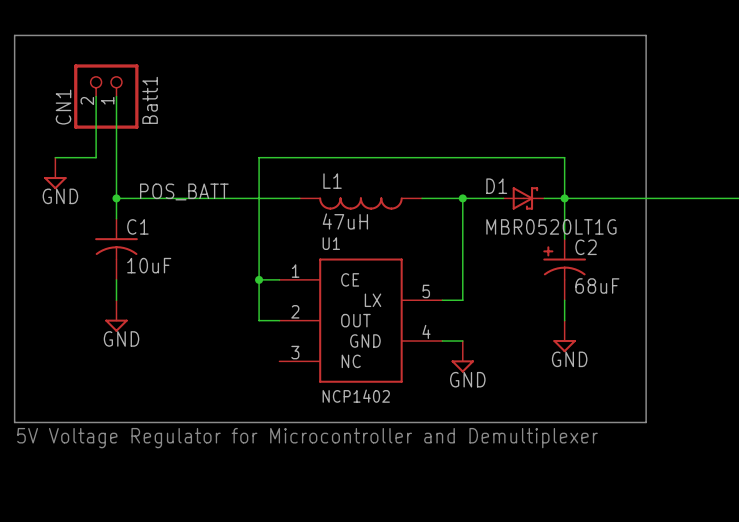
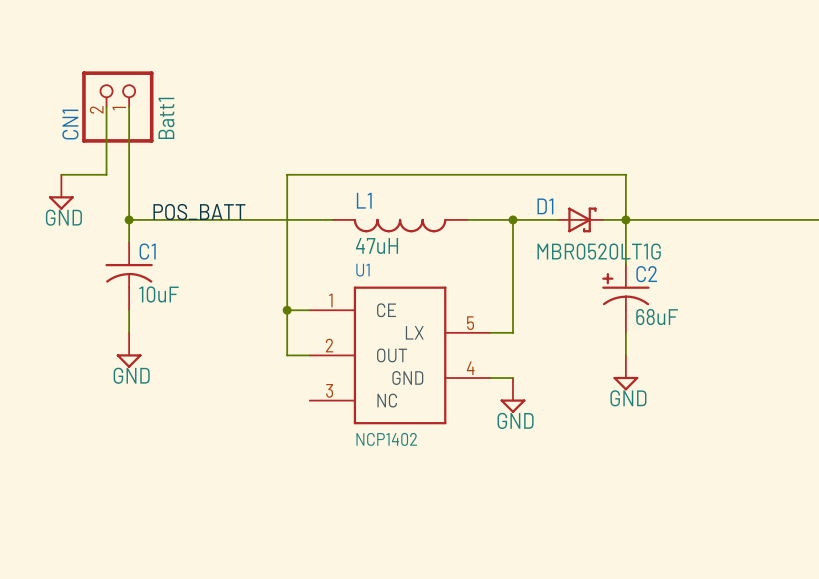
line: (14, 35) (14, 422) (646, 422) (646, 35) (14, 35) -> none
text: 5V Voltage Regulator for Microcontroller and Demultiplexer (307, 438) -> none

